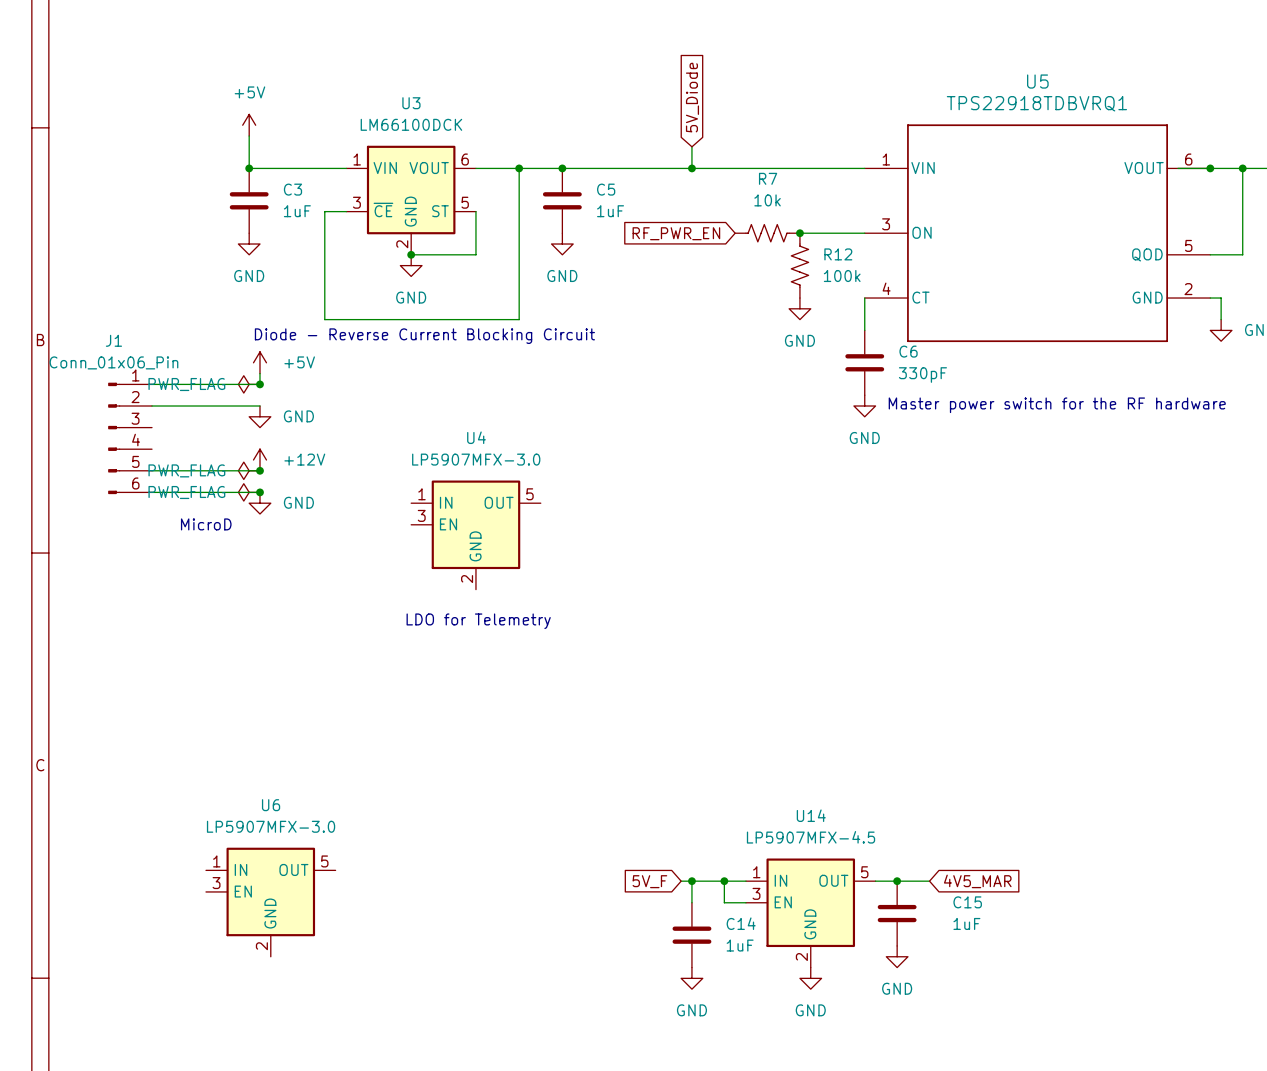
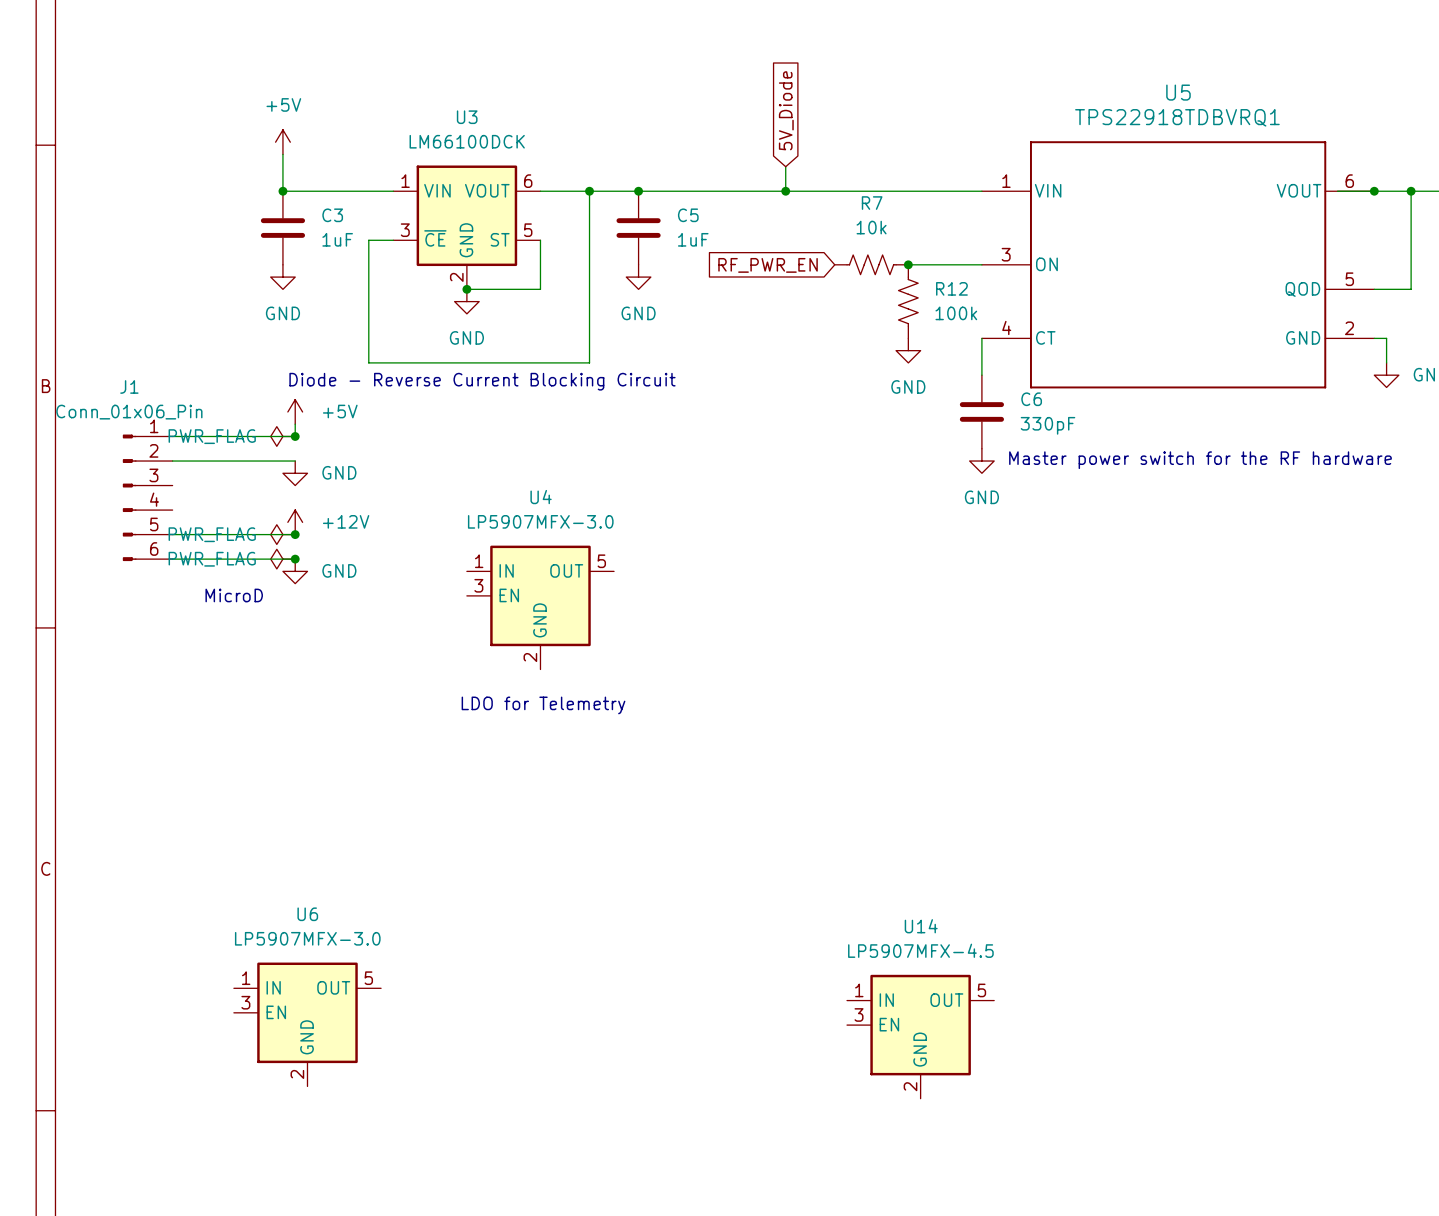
global label: 5V_F (649, 881) -> none
wire: (681, 881) (745, 881) -> none
wire: (691, 881) (691, 902) -> none
junction: (691, 881) -> none
wire: (724, 881) (724, 902) (745, 902) -> none
junction: (724, 881) -> none
wire: (875, 881) (929, 881) -> none
junction: (897, 881) -> none
global label: 4V5_MAR (977, 881) -> none
C15: 1uF (897, 913) -> none
C14: 1uF (691, 935) -> none
power symbol: GND (897, 956) -> none
power symbol: GND (691, 978) -> none
power symbol: GND (810, 978) -> none

